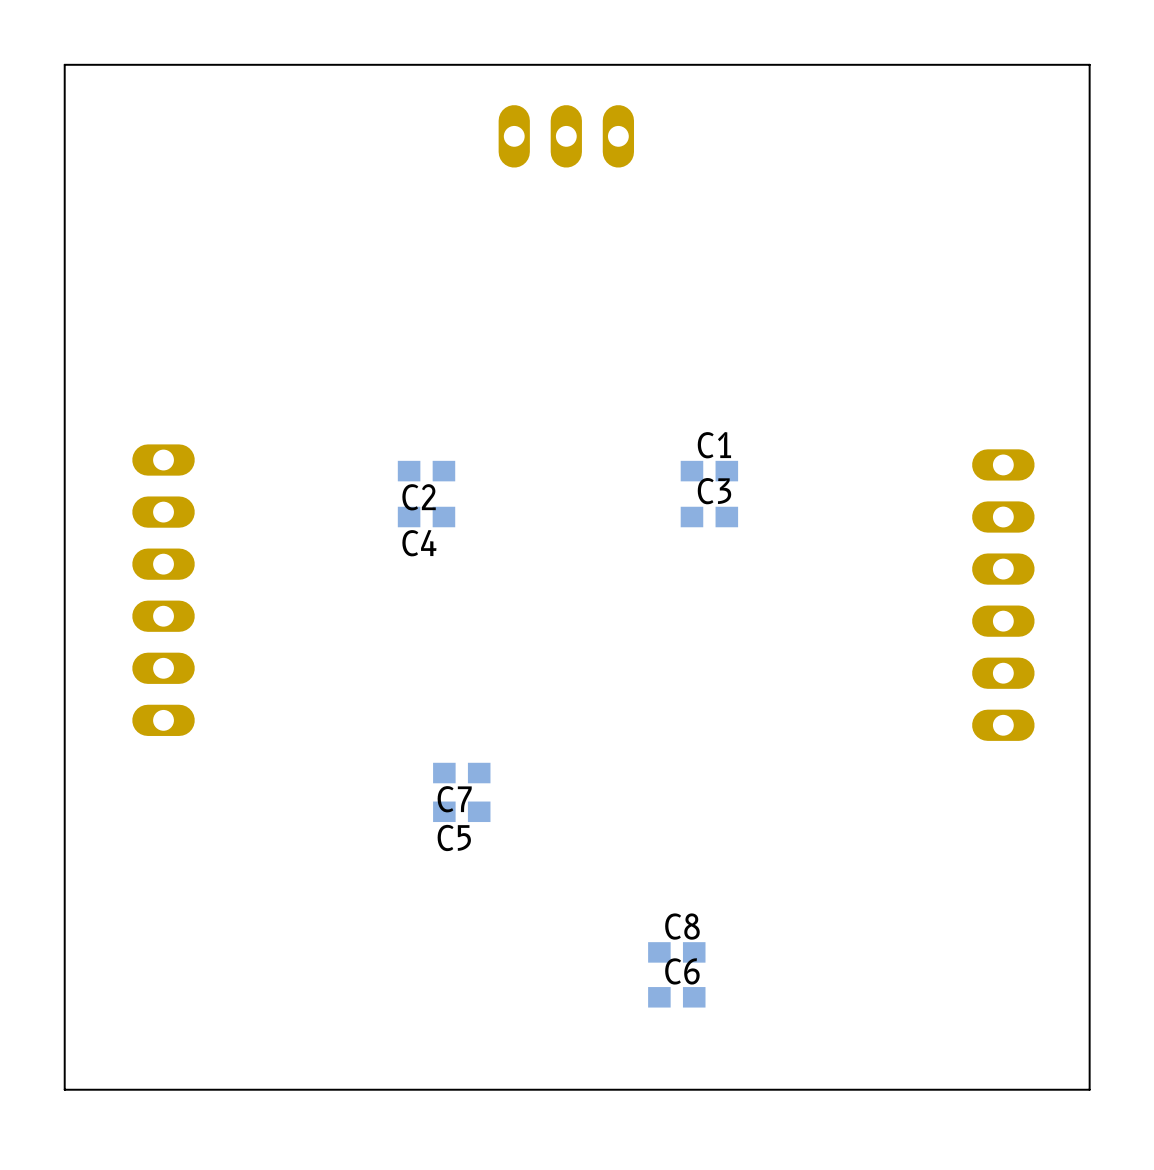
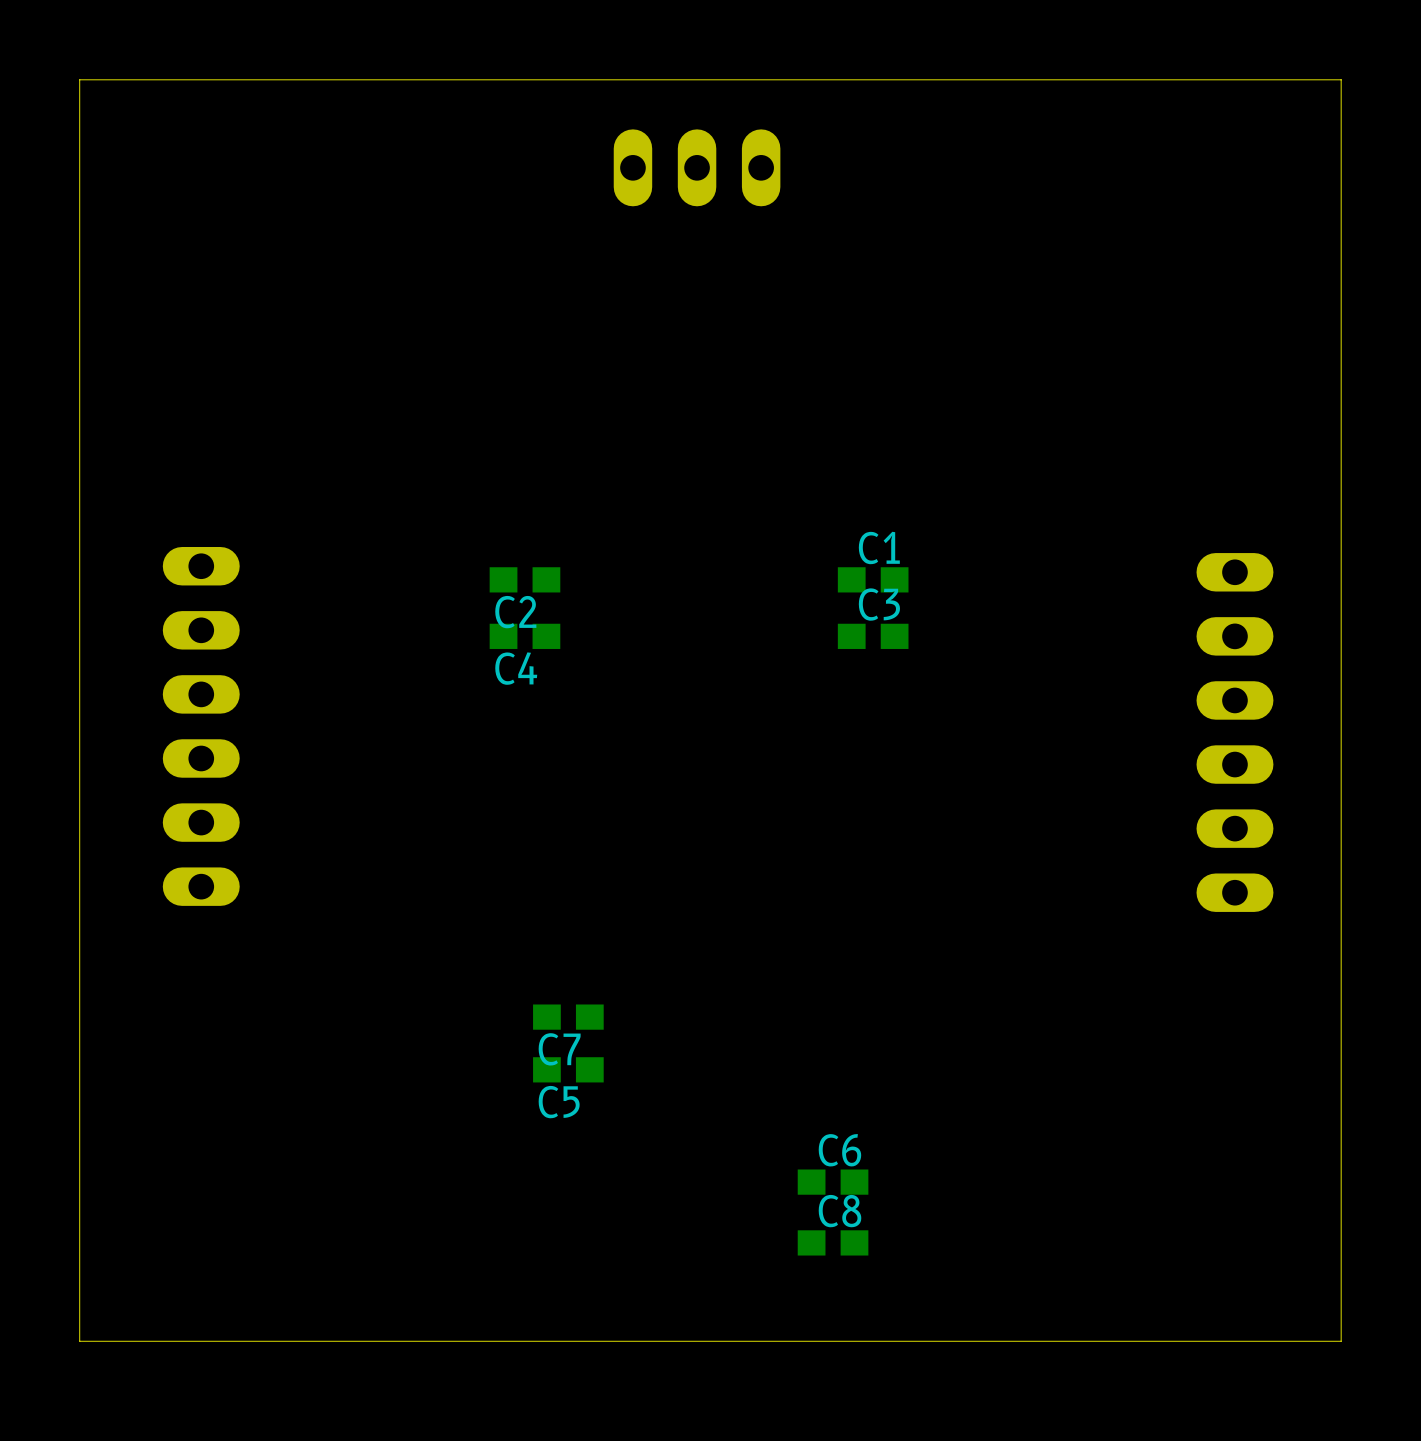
C7 position: (461, 773) -> (568, 1017)
C5 position: (461, 811) -> (568, 1069)
C8 position: (676, 952) -> (833, 1242)
C6 position: (676, 997) -> (833, 1182)

